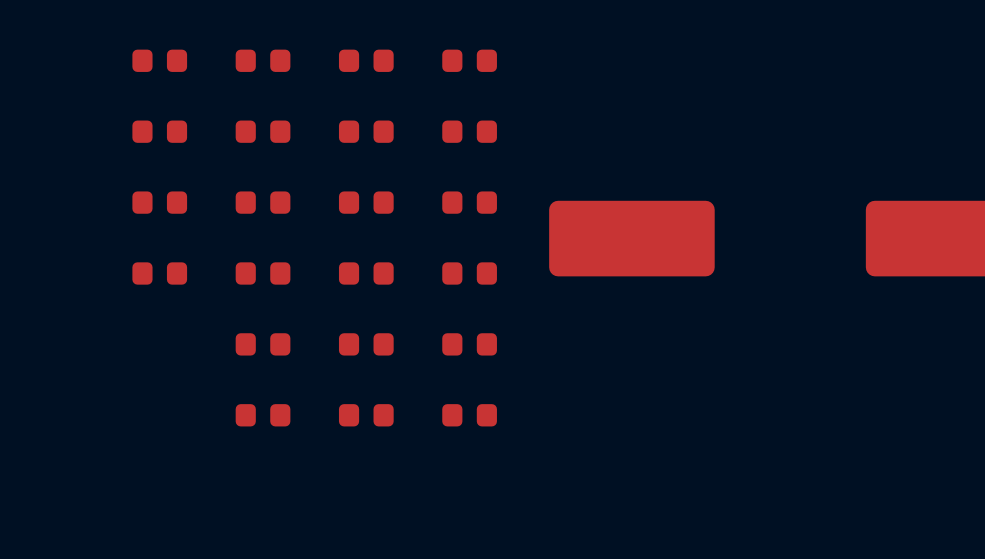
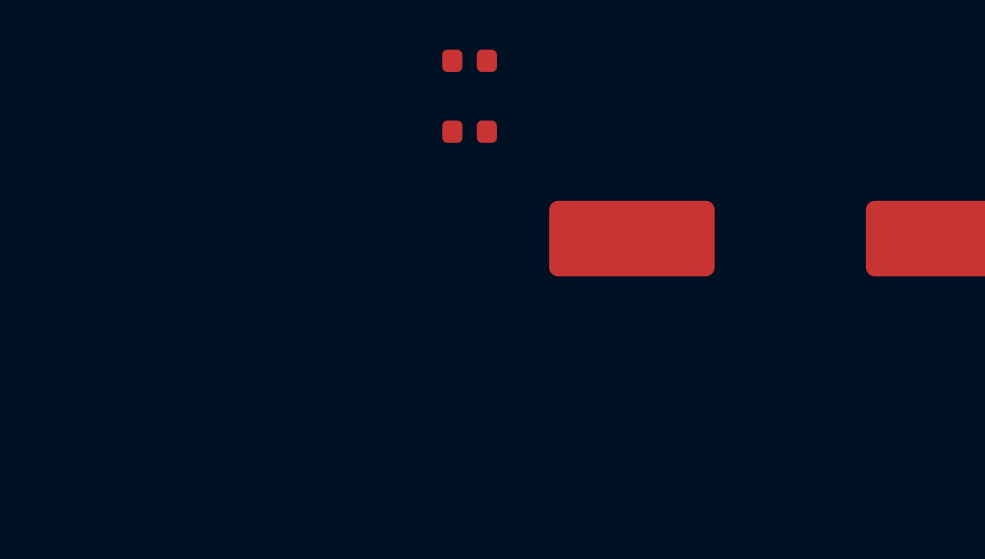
part: (159, 60) -> none
part: (263, 60) -> none
part: (366, 60) -> none
part: (159, 131) -> none
part: (263, 131) -> none
part: (366, 131) -> none
part: (159, 202) -> none
part: (263, 202) -> none
part: (366, 202) -> none
part: (469, 202) -> none
part: (159, 273) -> none
part: (263, 273) -> none
part: (366, 273) -> none
part: (469, 273) -> none
part: (263, 344) -> none
part: (366, 344) -> none
part: (469, 344) -> none
part: (263, 415) -> none
part: (366, 415) -> none
part: (469, 415) -> none

